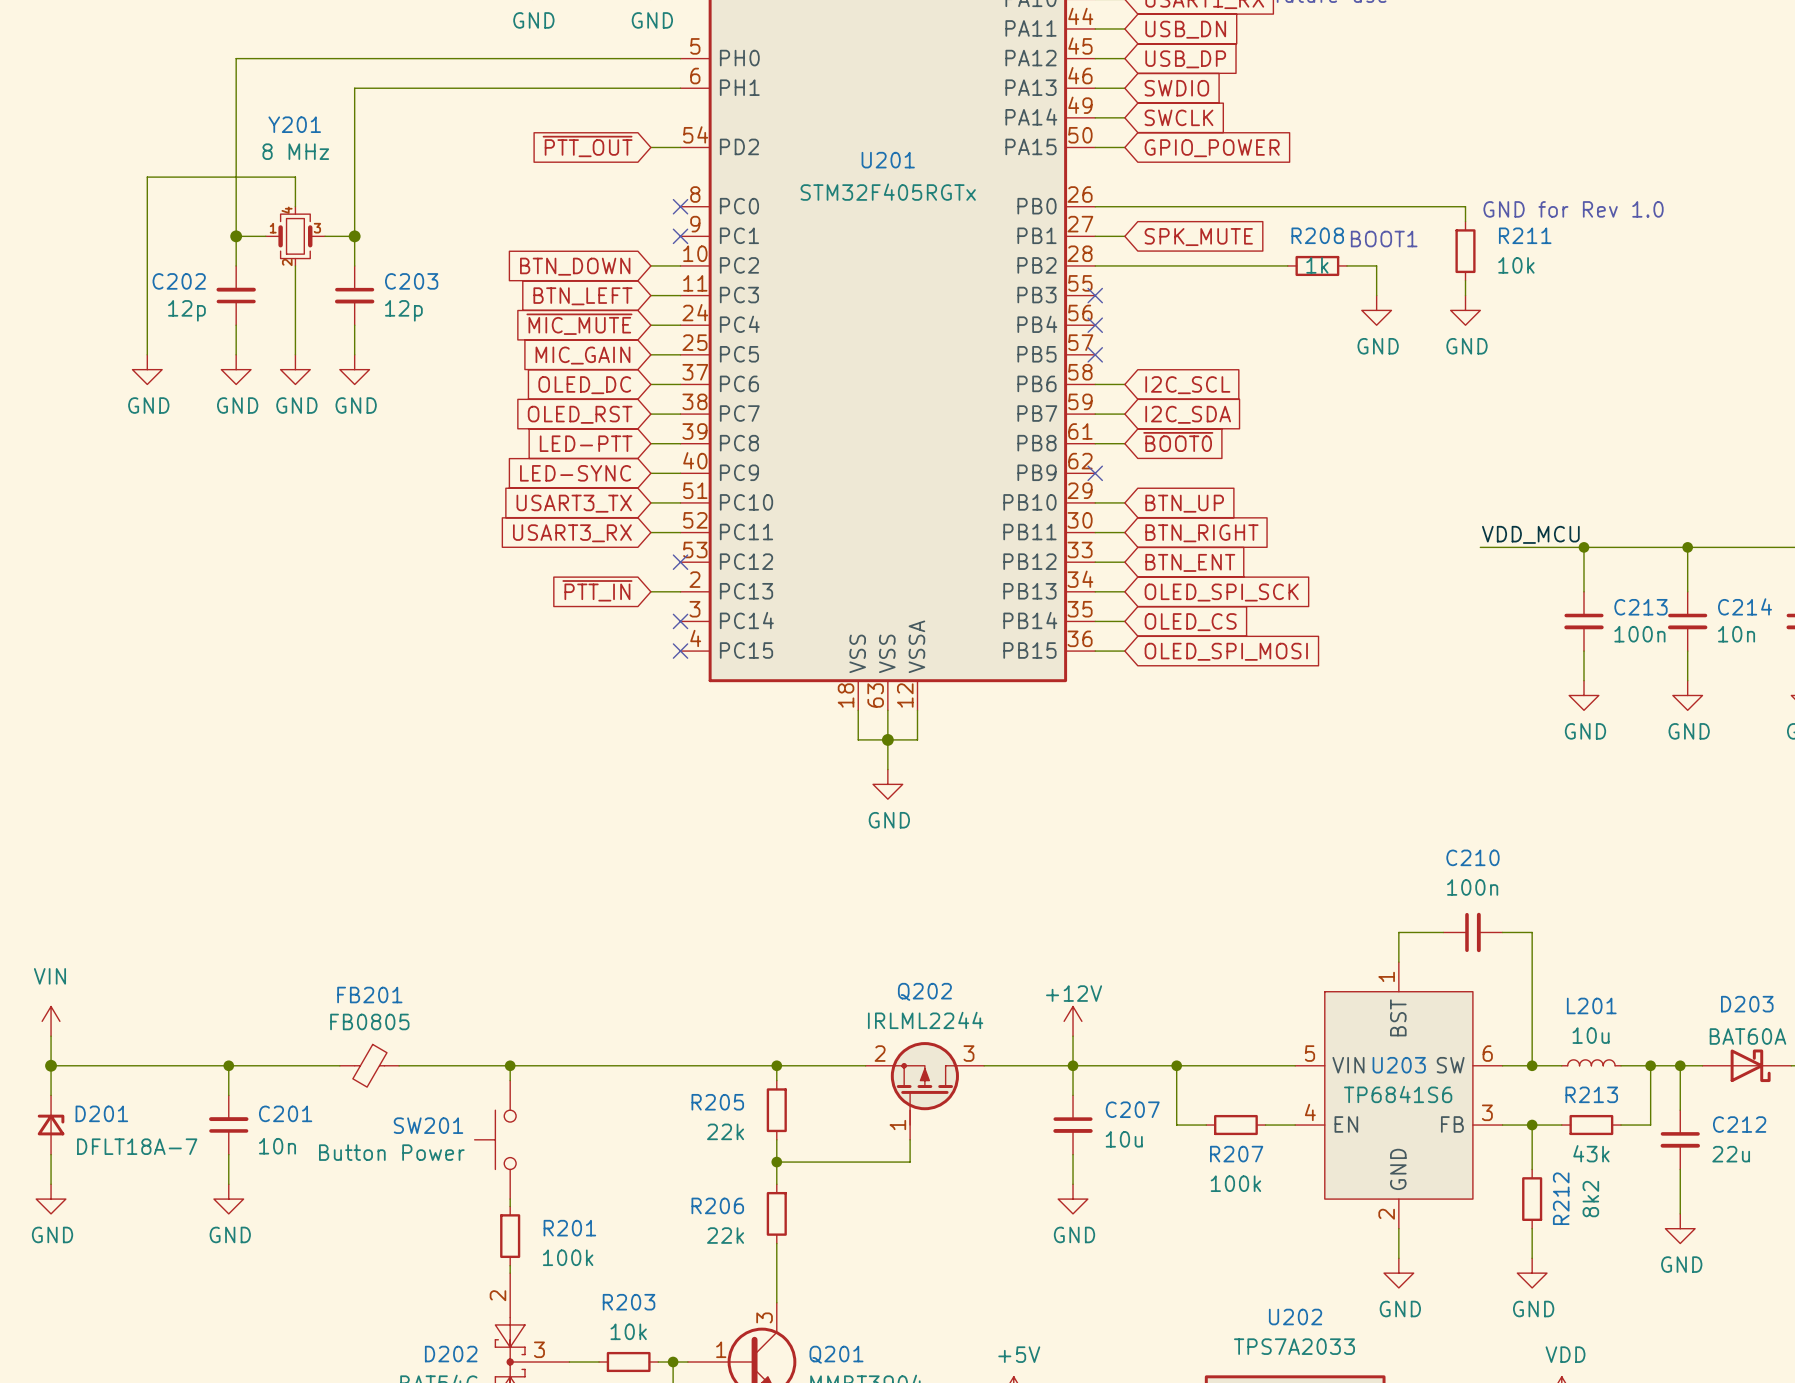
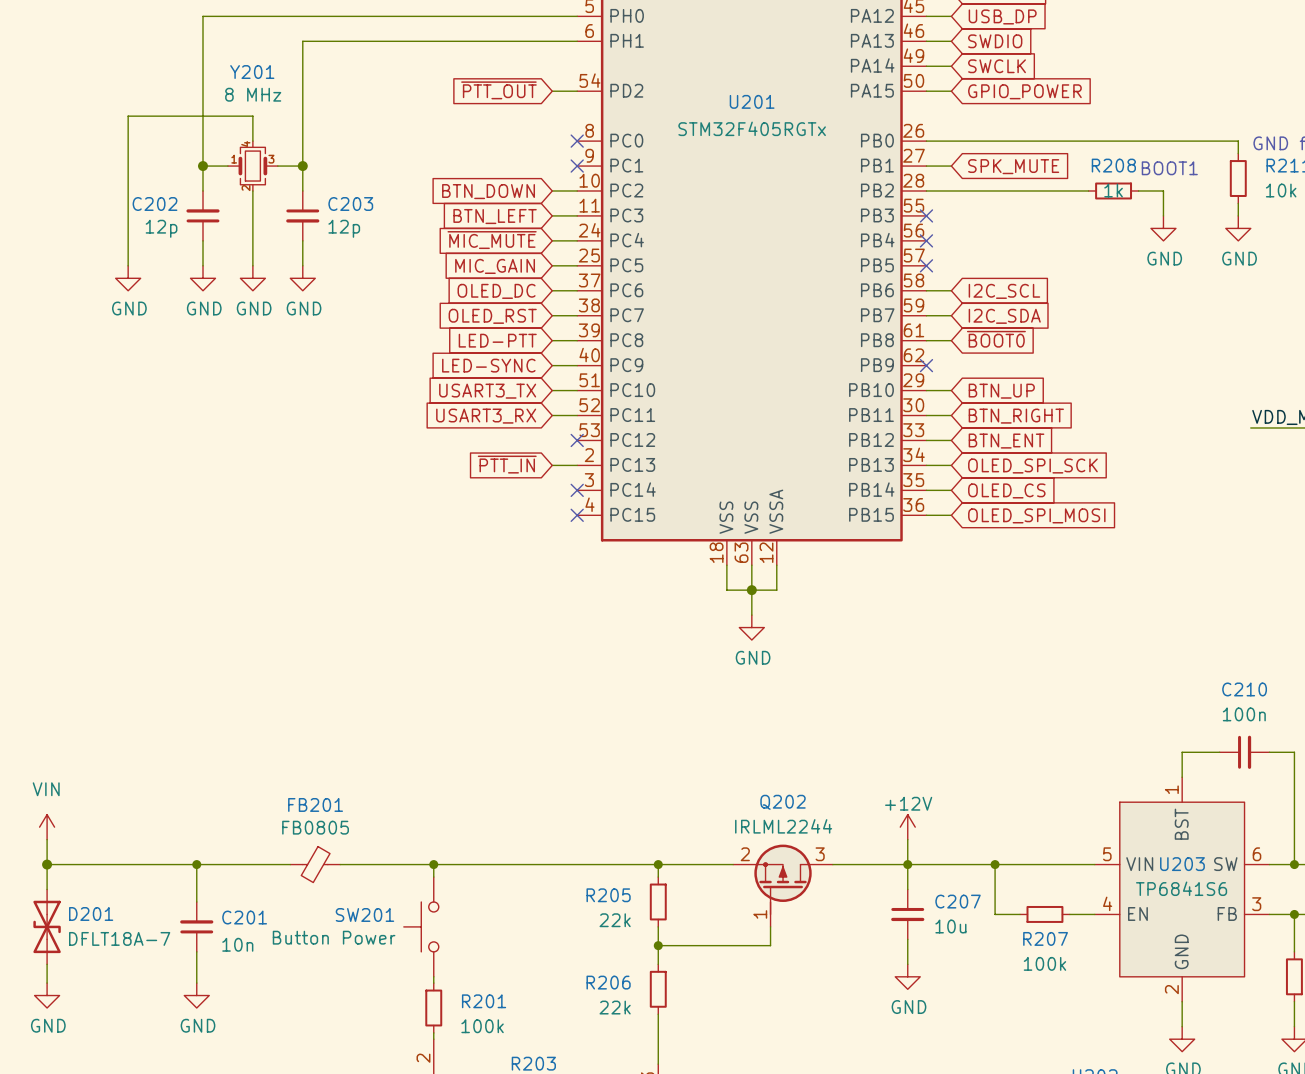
D201 symbol: [37, 1095, 65, 1155] -> [33, 889, 61, 965]
C201 position: (228, 1125) -> (196, 926)
power symbol position: GND (51, 1199) -> GND (47, 995)
power symbol position: GND (228, 1199) -> GND (196, 995)

